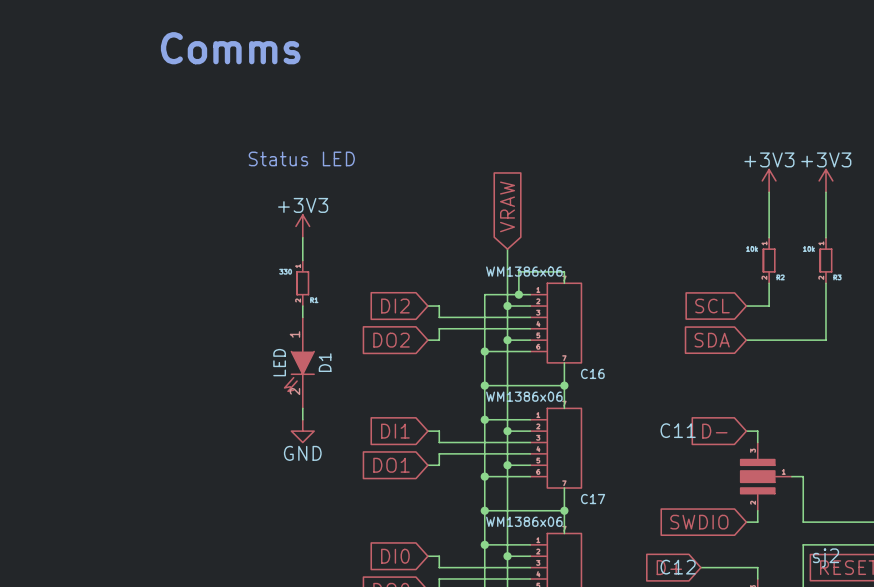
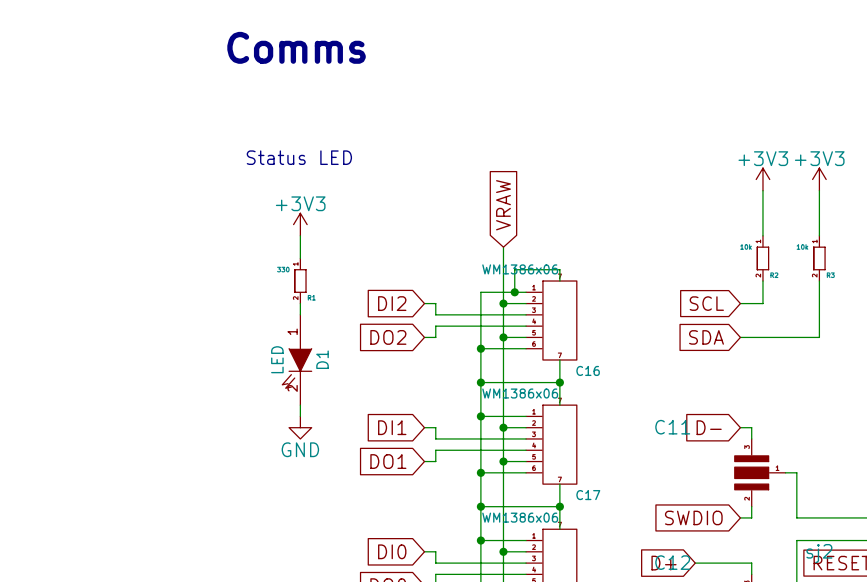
text position: Comms (230, 48) -> Comms (296, 47)

